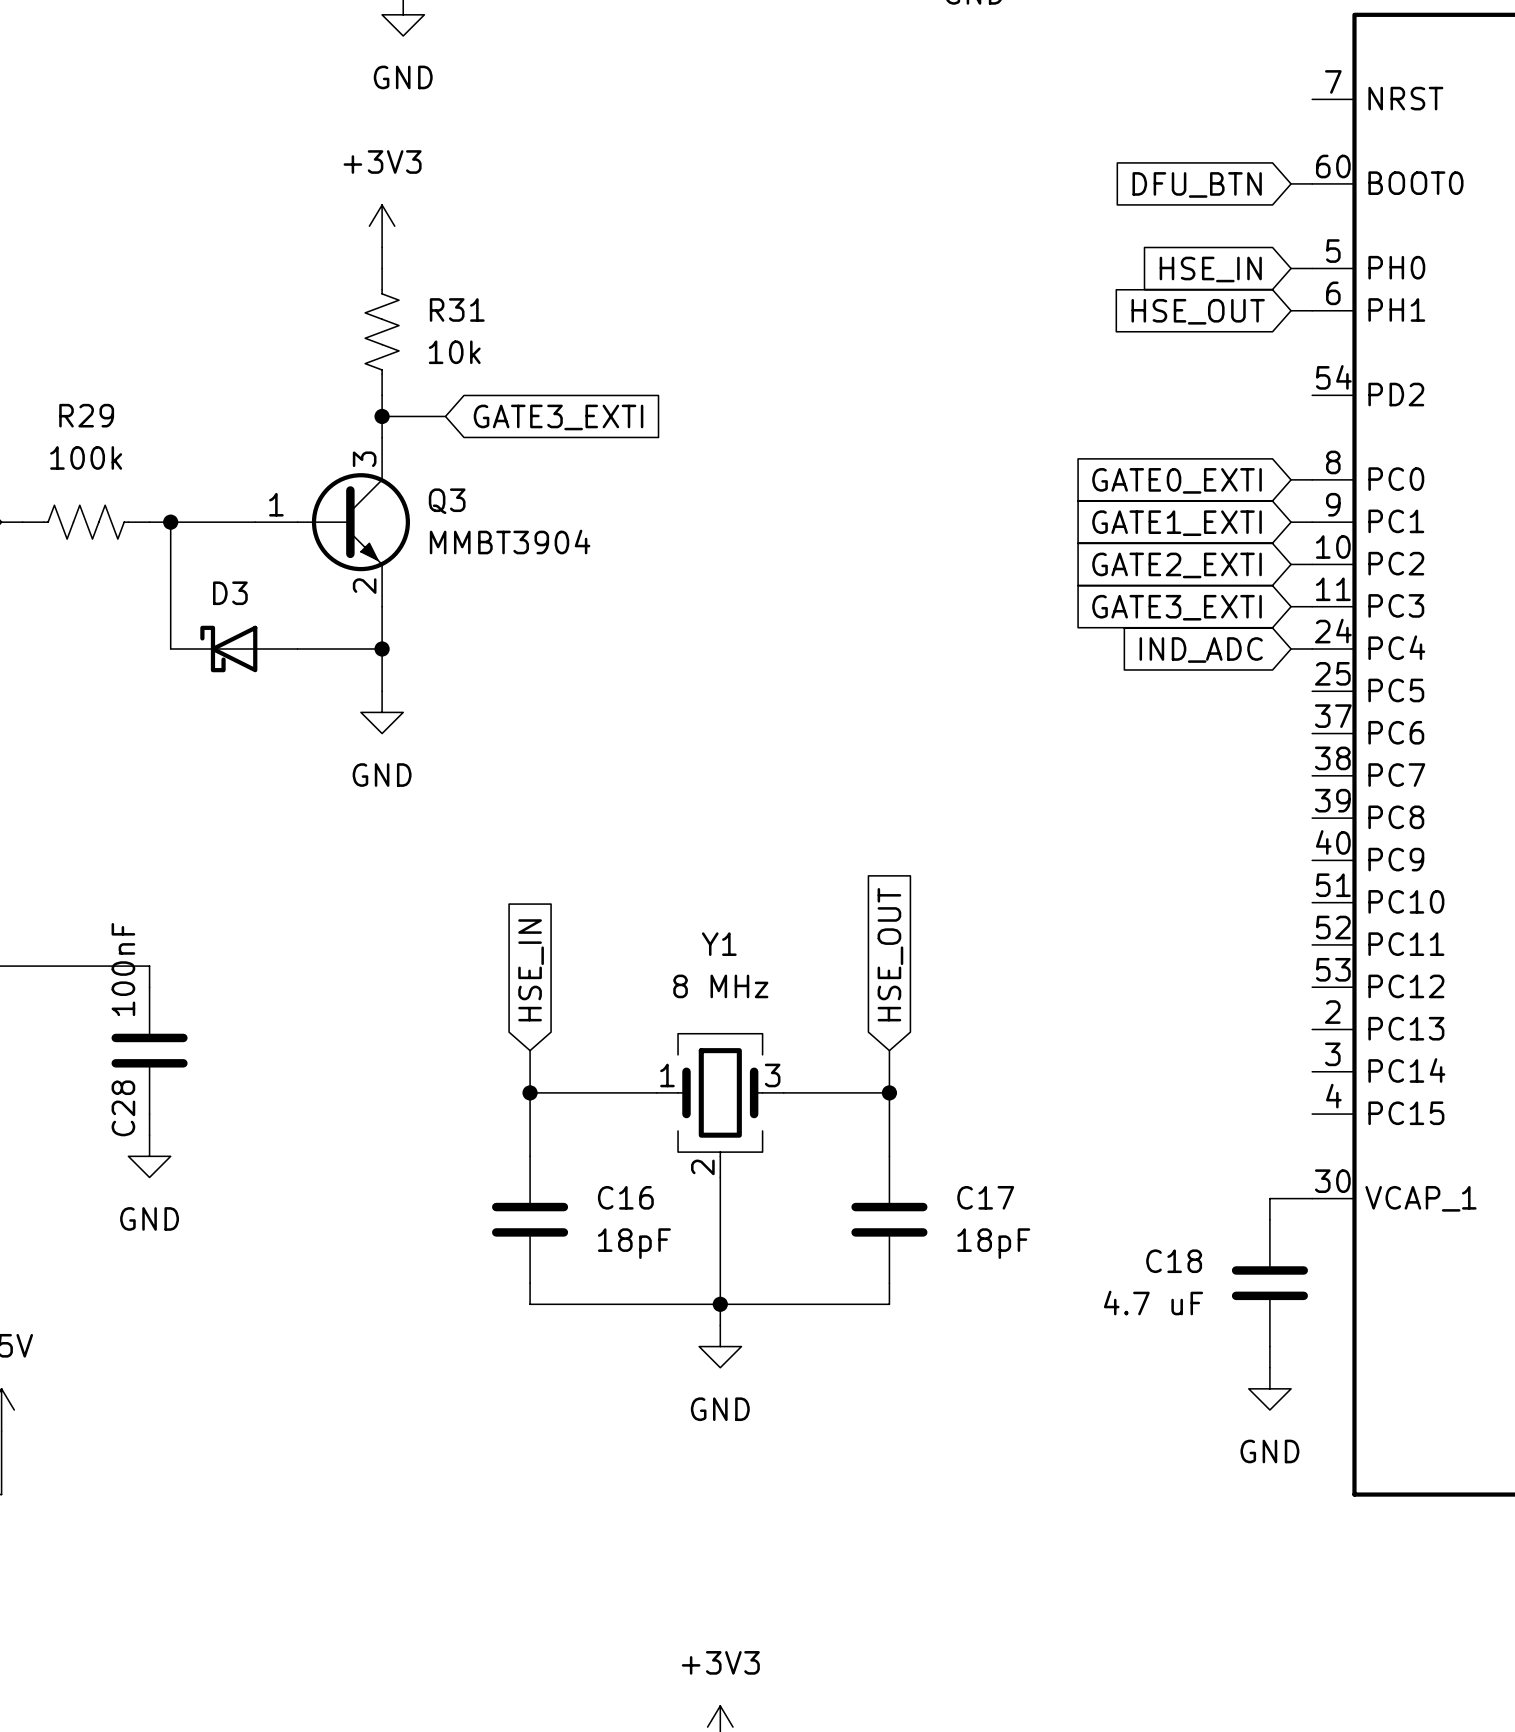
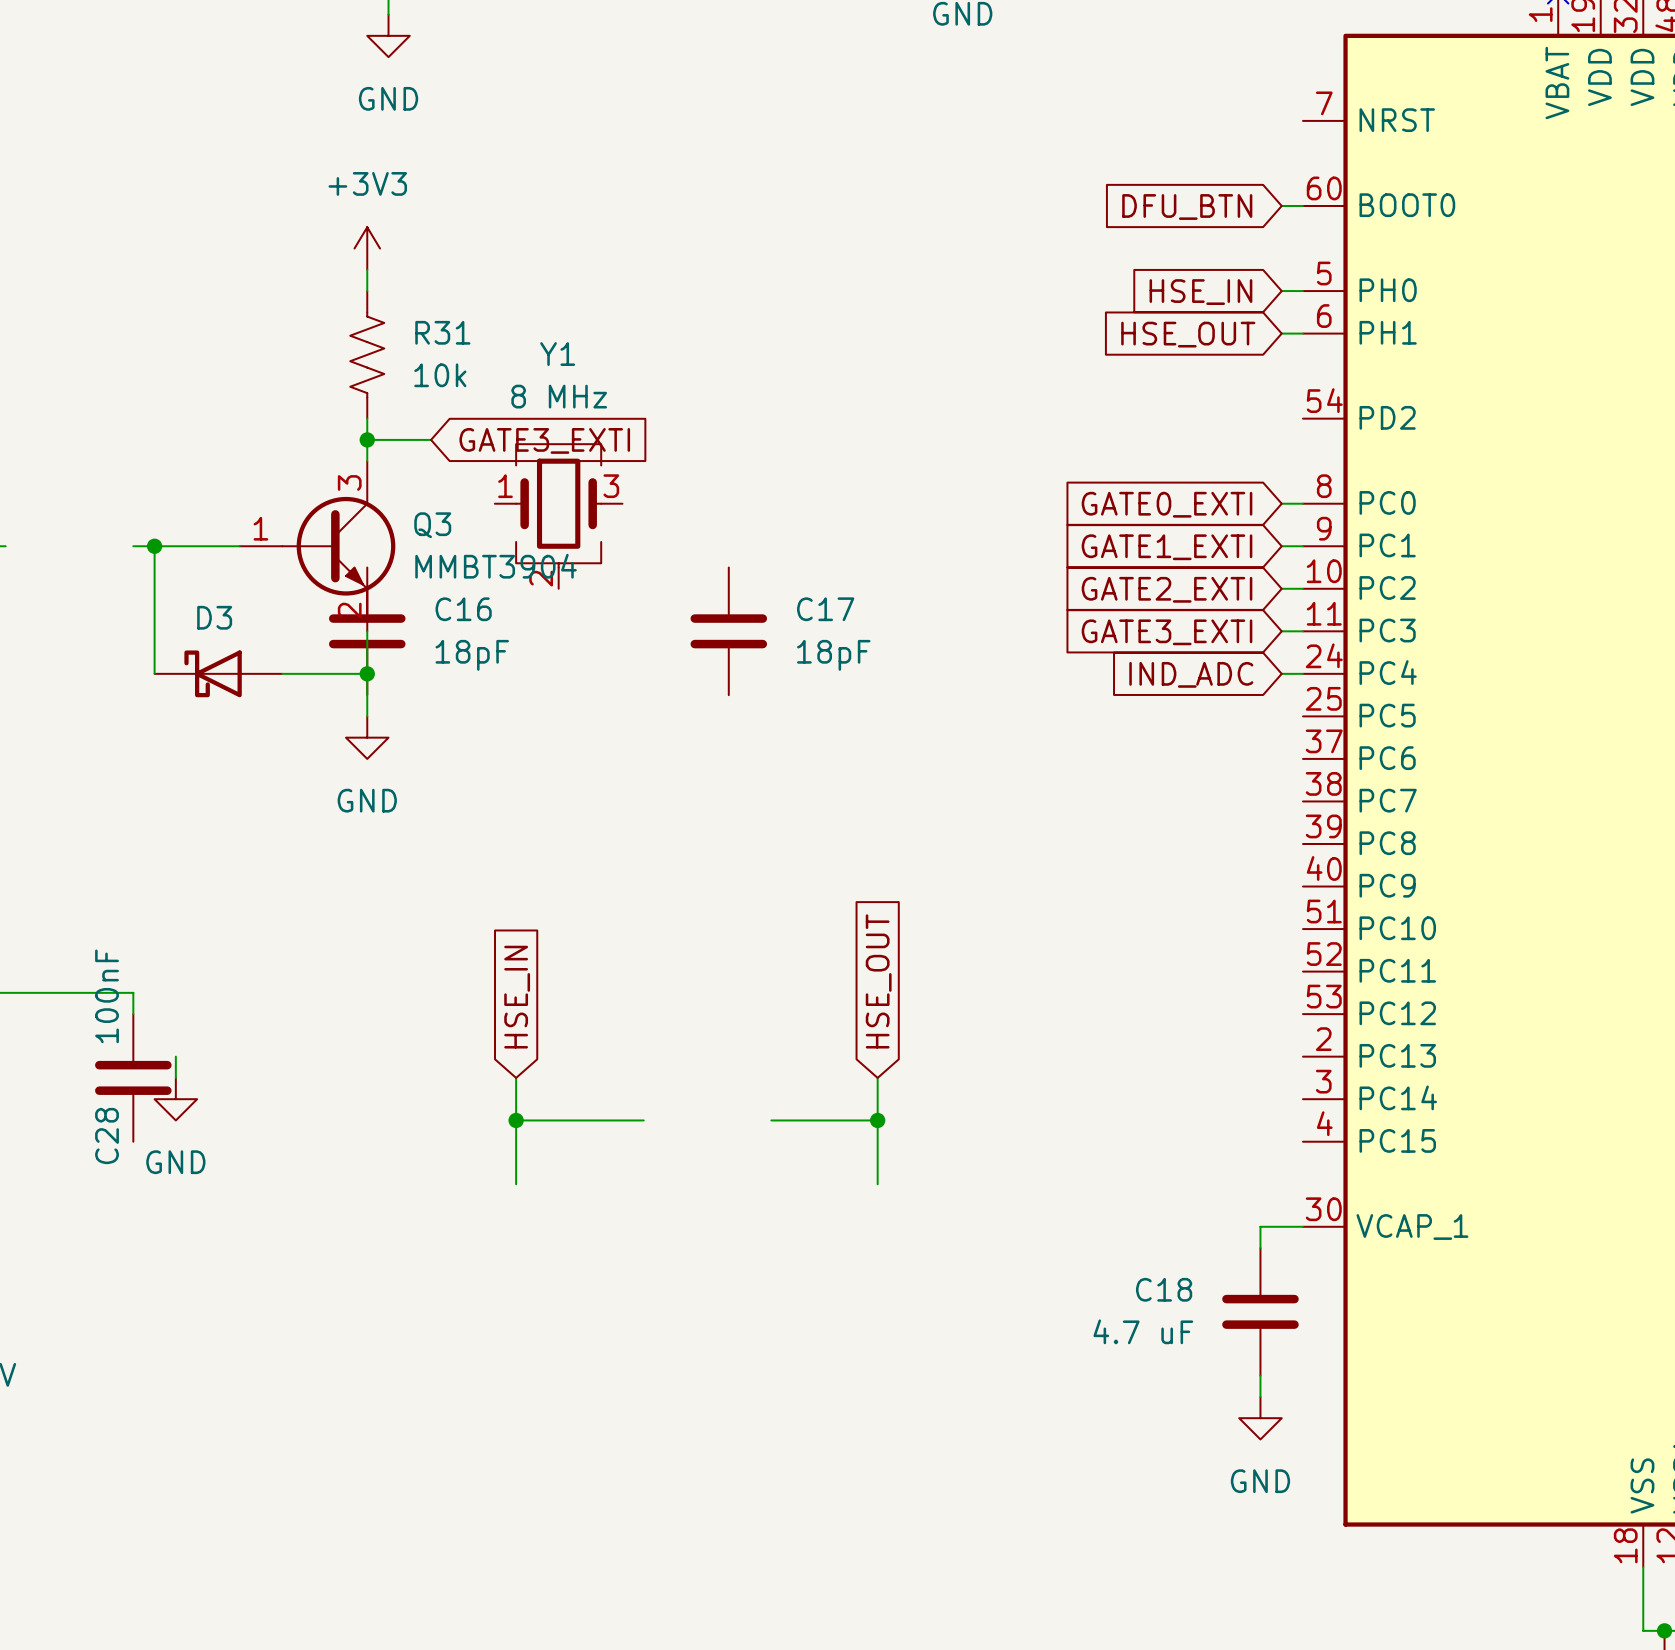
R29: 100k (86, 522) -> none
Y1 position: (720, 1105) -> (558, 516)
wire: (149, 1114) (149, 1135) -> (175, 1056) (175, 1077)
power symbol position: GND (149, 1156) -> GND (175, 1099)
wire: (720, 1177) (720, 1325) -> none
C16 position: (530, 1219) -> (367, 631)
C17 position: (889, 1219) -> (728, 631)
wire: (530, 1283) (530, 1304) (889, 1304) (889, 1283) -> none
junction: (720, 1304) -> none
power symbol: GND (720, 1346) -> none

